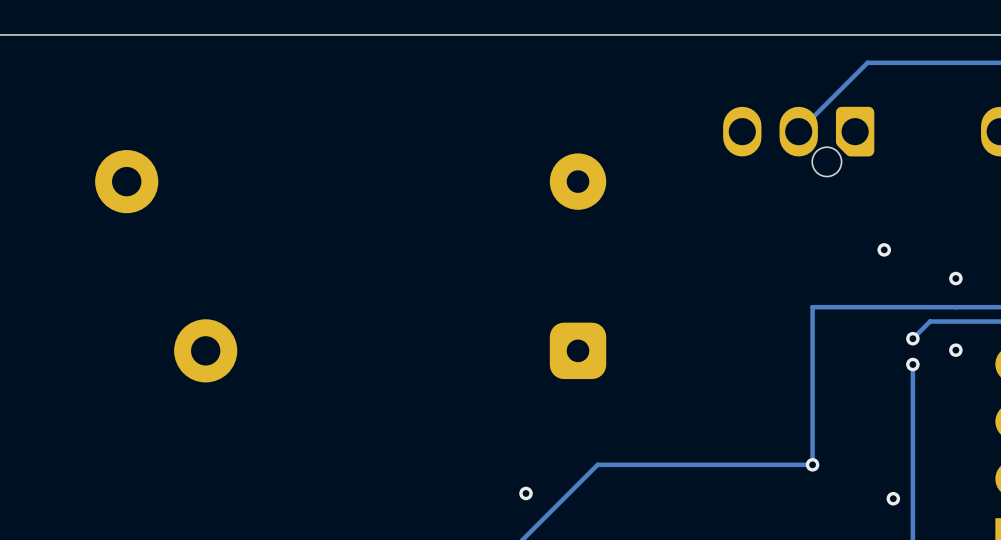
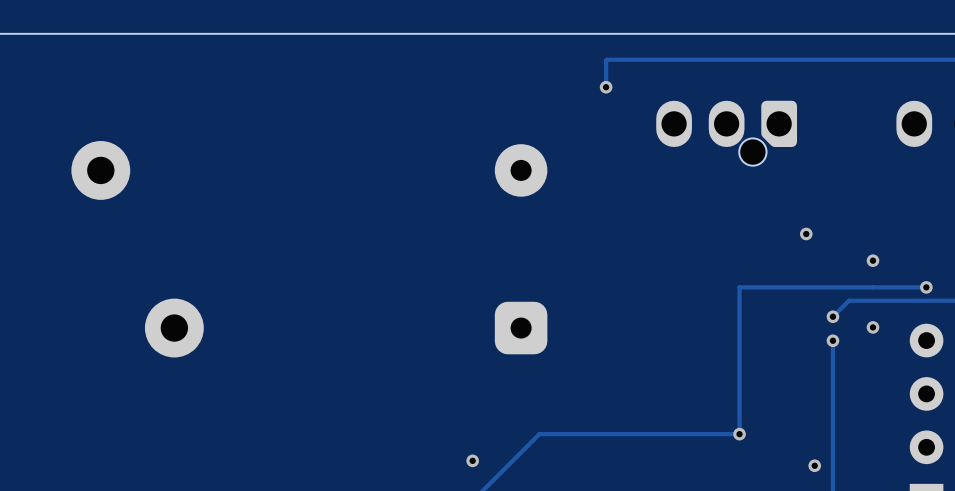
track: (867, 62) (798, 131) -> (790, 59) (606, 59) (606, 87)
via: none -> (606, 87)

